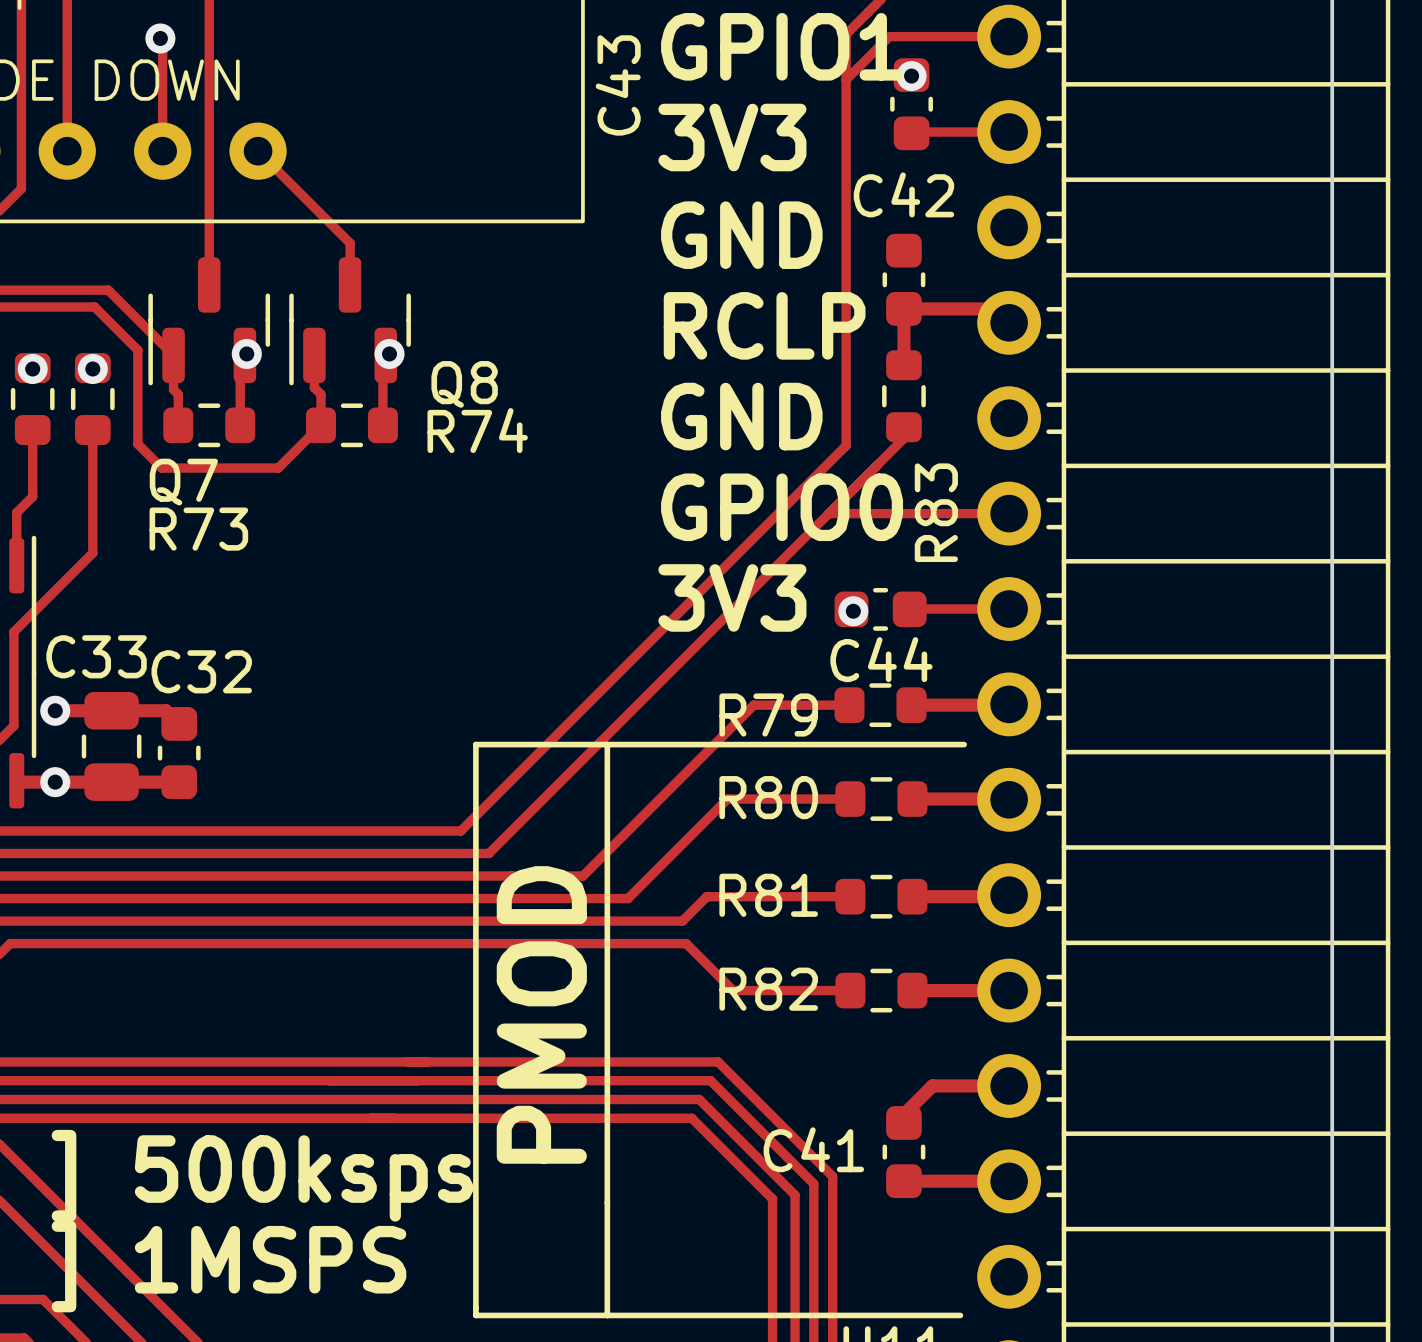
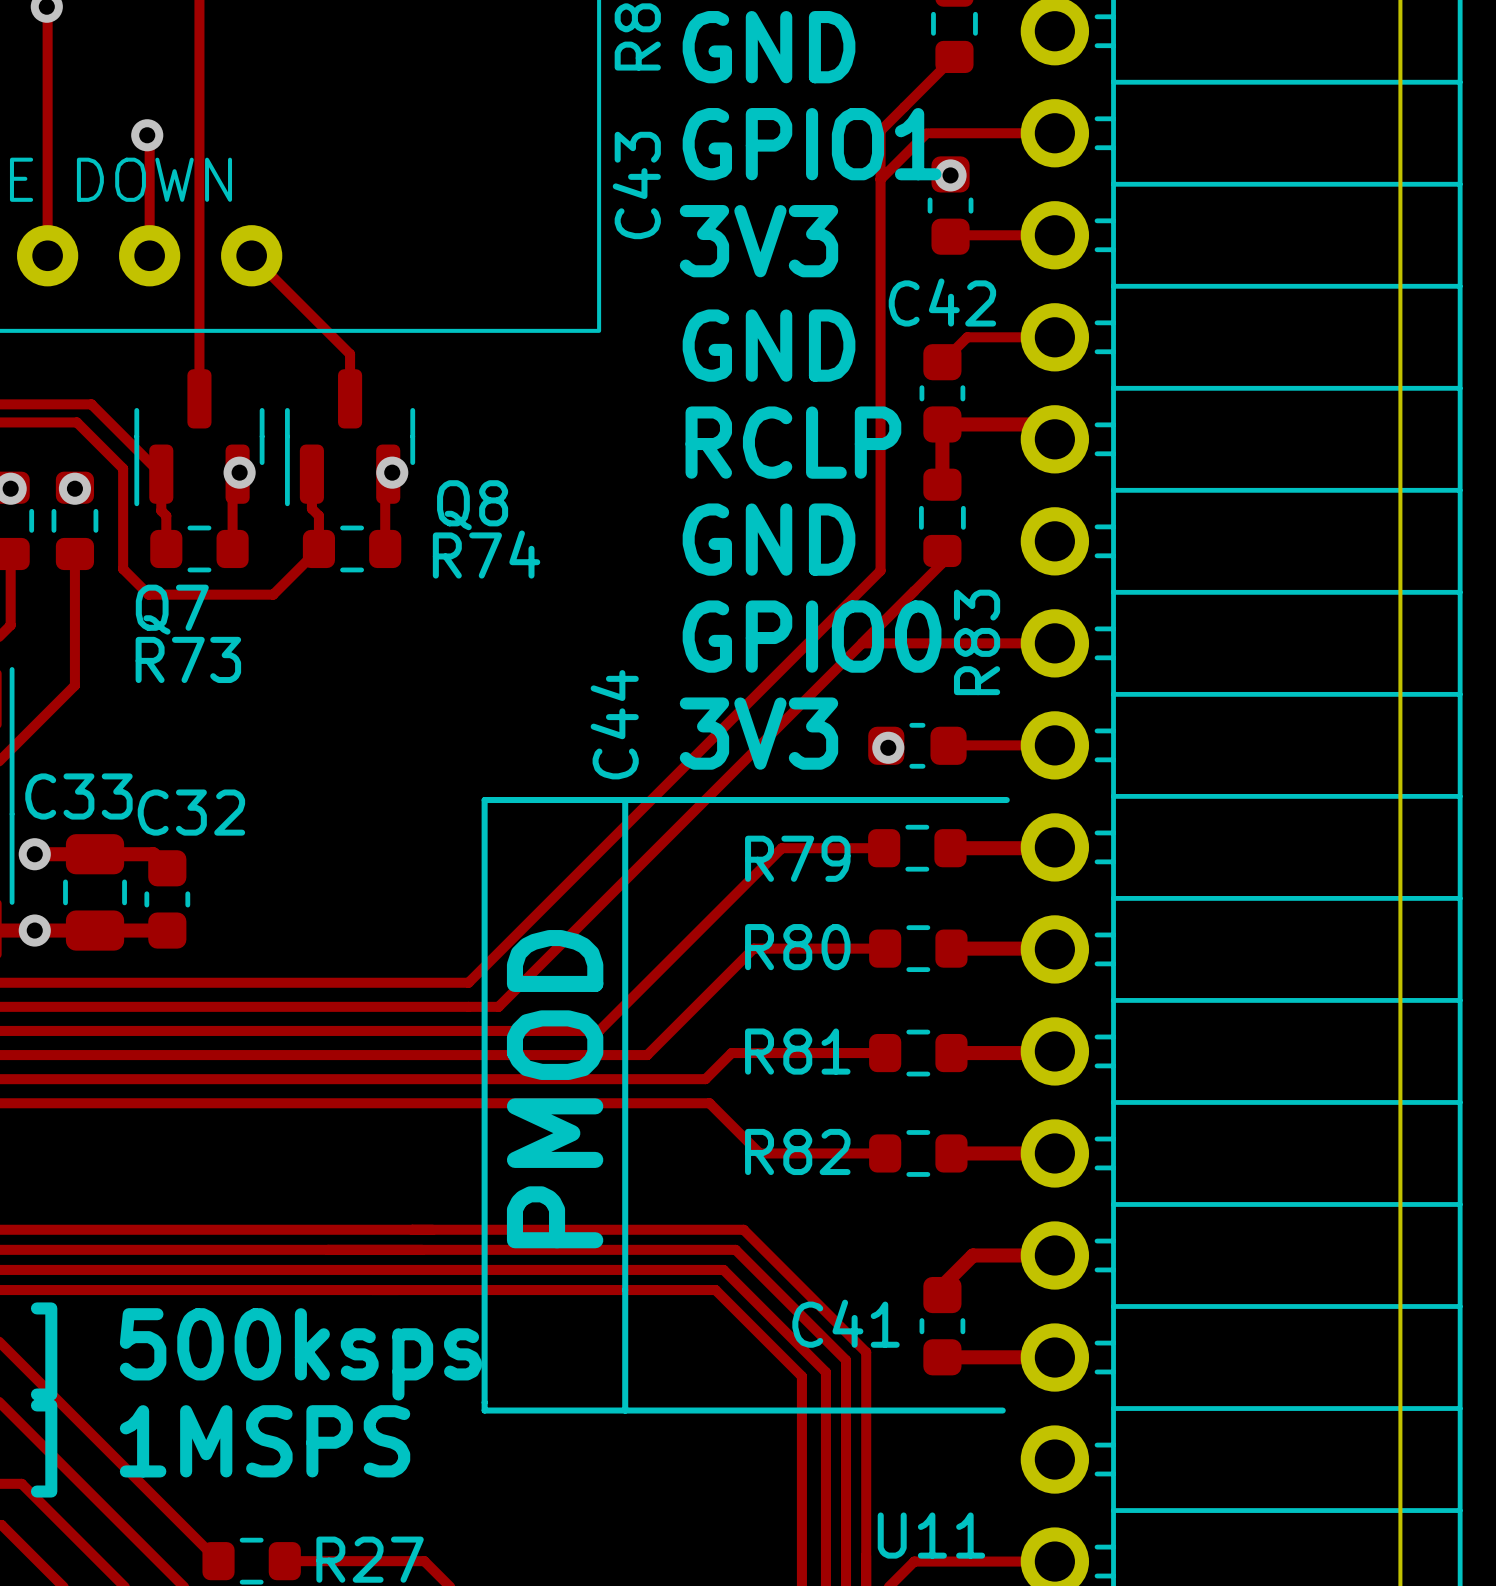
track: none -> (1054, 337) (967, 337) (942, 362)
C44 name rotation: 0° (881, 659) -> 90° counterclockwise (614, 724)
C44 name position: C44 (881, 659) -> C44 (614, 724)
line: (475, 744) (964, 744) -> (484, 890) (484, 800) (1006, 800)
text position: PMOD (541, 1014) -> PMOD (555, 1089)
line: (475, 1230) (475, 1315) (960, 1315) -> (484, 1410) (1002, 1410)
line: (607, 1230) (607, 1315) -> (625, 800) (625, 890)

